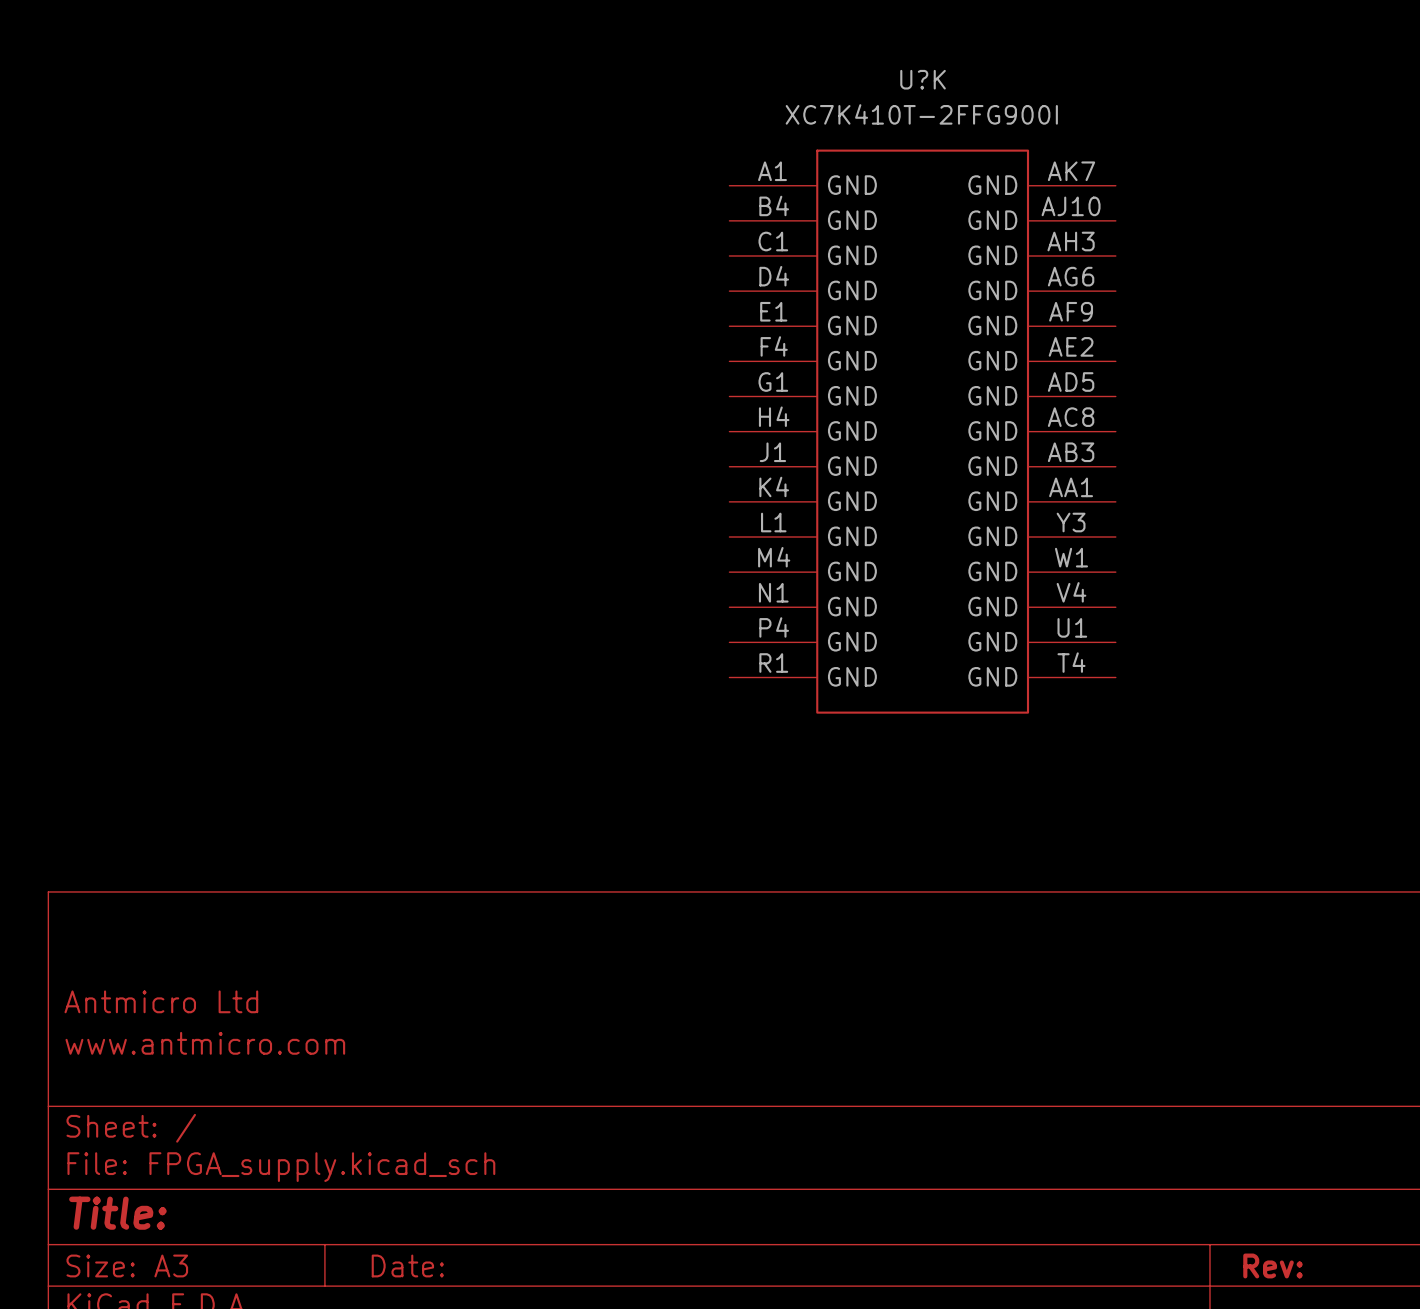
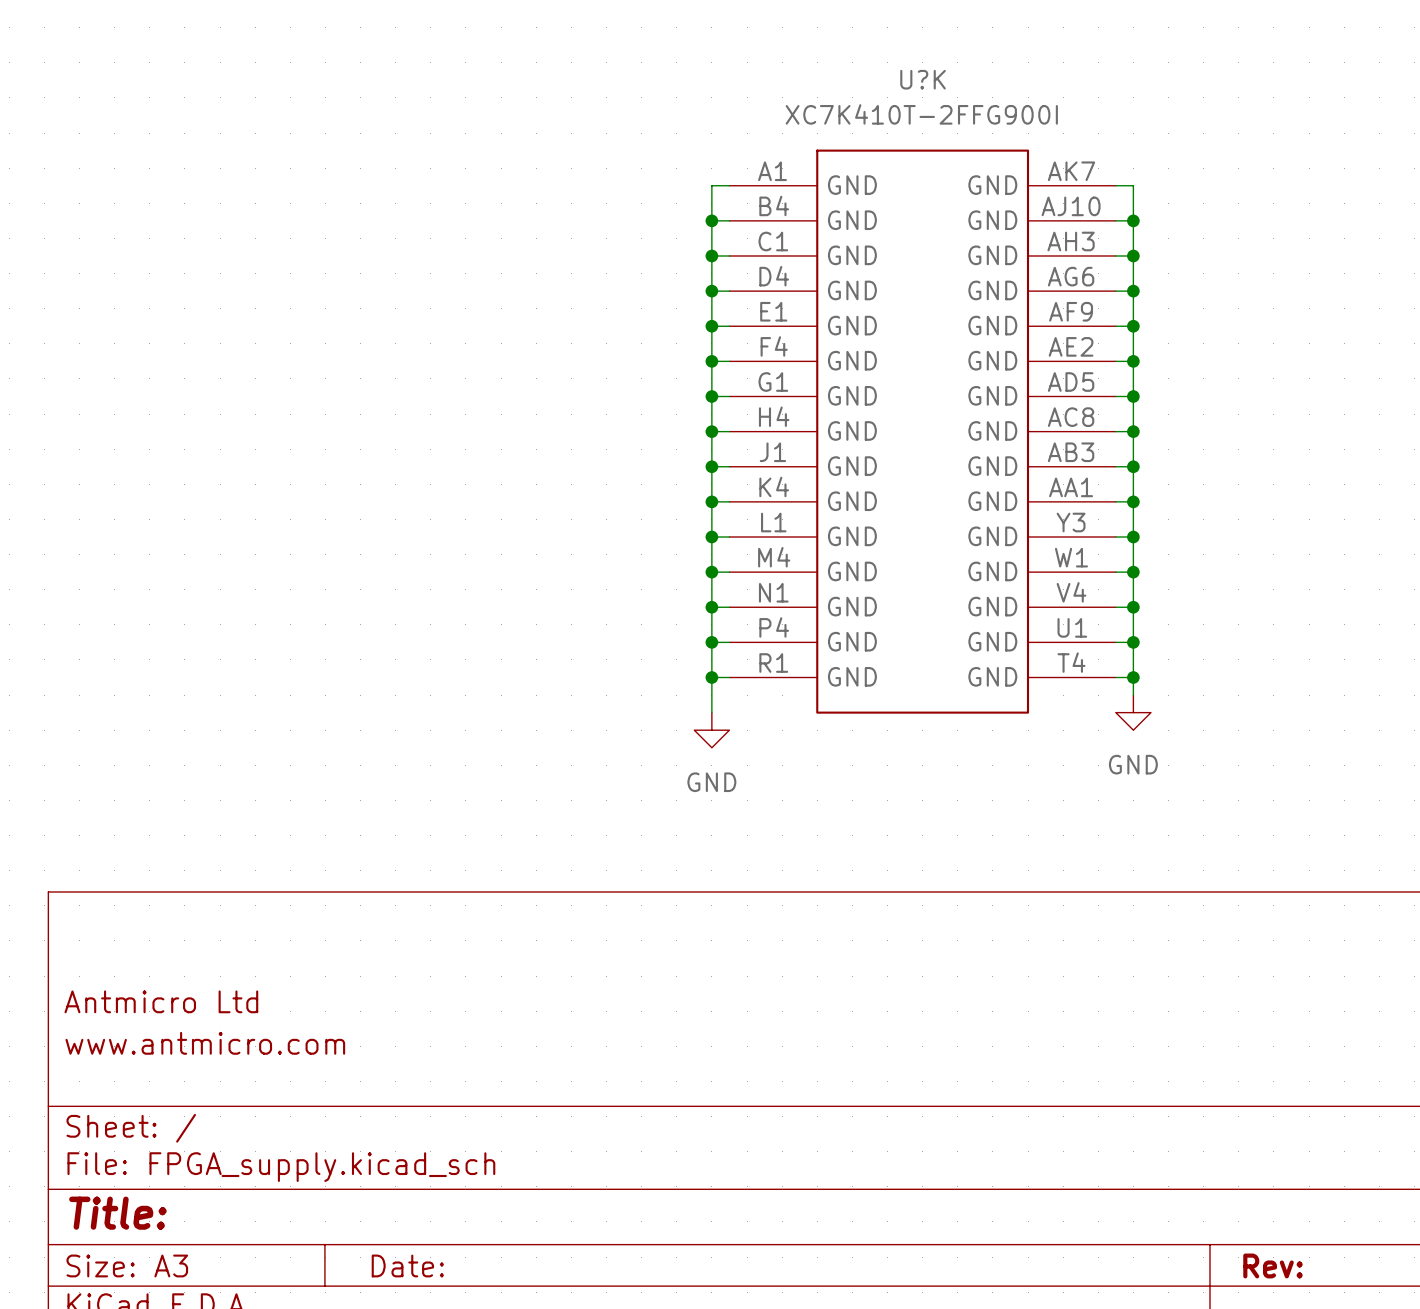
wire: none -> (729, 185) (711, 185) (711, 712)
wire: none -> (1115, 185) (1133, 185) (1133, 695)
wire: none -> (711, 220) (729, 220)
junction: none -> (711, 220)
wire: none -> (1115, 220) (1133, 220)
junction: none -> (1133, 220)
wire: none -> (711, 255) (729, 255)
junction: none -> (711, 255)
wire: none -> (1115, 255) (1133, 255)
junction: none -> (1133, 255)
wire: none -> (711, 291) (729, 291)
junction: none -> (711, 291)
wire: none -> (1115, 291) (1133, 291)
junction: none -> (1133, 291)
wire: none -> (711, 326) (729, 326)
junction: none -> (711, 326)
wire: none -> (1115, 326) (1133, 326)
junction: none -> (1133, 326)
wire: none -> (711, 361) (729, 361)
junction: none -> (711, 361)
wire: none -> (1115, 361) (1133, 361)
junction: none -> (1133, 361)
wire: none -> (711, 396) (729, 396)
junction: none -> (711, 396)
wire: none -> (1115, 396) (1133, 396)
junction: none -> (1133, 396)
wire: none -> (711, 431) (729, 431)
junction: none -> (711, 431)
wire: none -> (1115, 431) (1133, 431)
junction: none -> (1133, 431)
wire: none -> (711, 466) (729, 466)
junction: none -> (711, 466)
wire: none -> (1115, 466) (1133, 466)
junction: none -> (1133, 466)
wire: none -> (711, 501) (729, 501)
junction: none -> (711, 501)
wire: none -> (1115, 501) (1133, 501)
junction: none -> (1133, 501)
wire: none -> (711, 537) (729, 537)
junction: none -> (711, 537)
wire: none -> (1115, 537) (1133, 537)
junction: none -> (1133, 537)
wire: none -> (711, 572) (729, 572)
junction: none -> (711, 572)
wire: none -> (1115, 572) (1133, 572)
junction: none -> (1133, 572)
wire: none -> (711, 607) (729, 607)
junction: none -> (711, 607)
wire: none -> (1115, 607) (1133, 607)
junction: none -> (1133, 607)
wire: none -> (711, 642) (729, 642)
junction: none -> (711, 642)
wire: none -> (1115, 642) (1133, 642)
junction: none -> (1133, 642)
wire: none -> (711, 677) (729, 677)
junction: none -> (711, 677)
wire: none -> (1115, 677) (1133, 677)
junction: none -> (1133, 677)
power symbol: none -> GND (1133, 712)
power symbol: none -> GND (711, 730)

